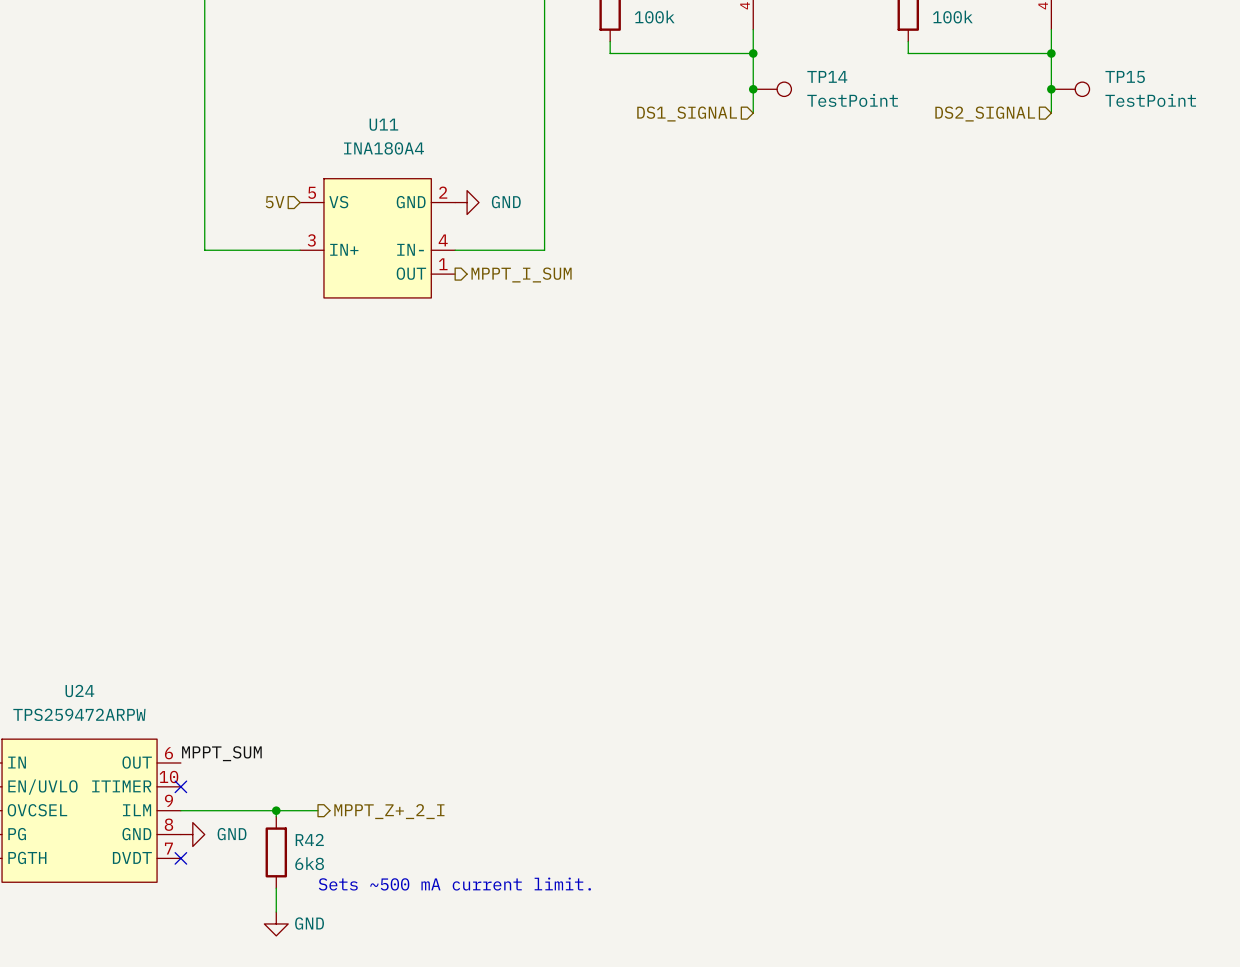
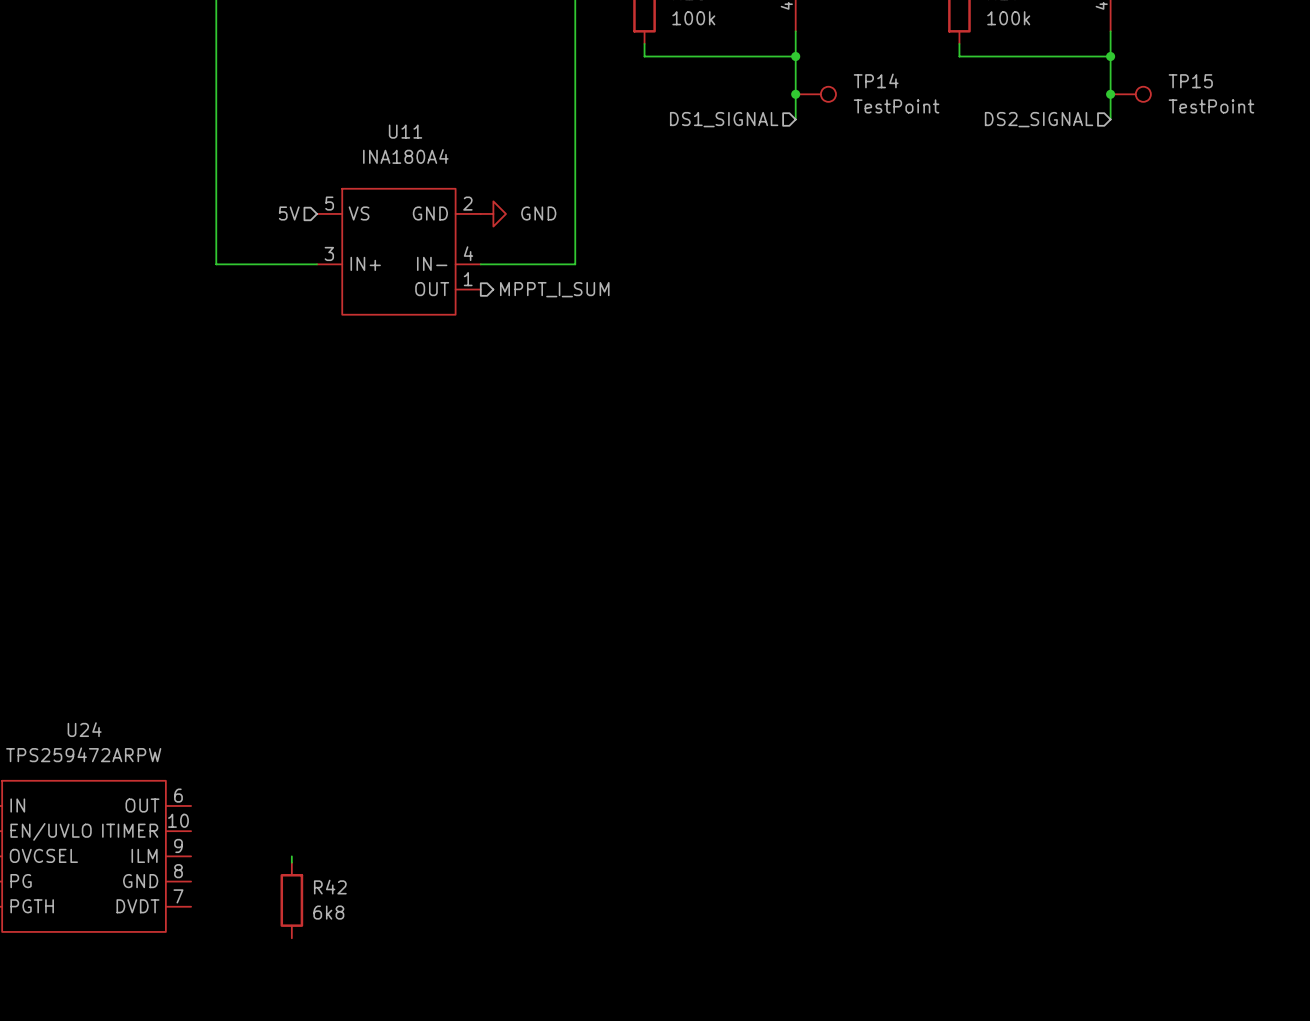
label: MPPT_SUM (221, 753) -> none
no-connect mark: (180, 786) -> none
wire: (180, 810) (318, 810) -> none
junction: (276, 810) -> none
hierarchical label: MPPT_Z+_2_I (389, 811) -> none
power symbol: GND (192, 834) -> none
no-connect mark: (180, 858) -> none
text: Sets ~500 mA current limit. (454, 884) -> none
wire: (276, 888) (276, 912) -> none
power symbol: GND (276, 923) -> none

